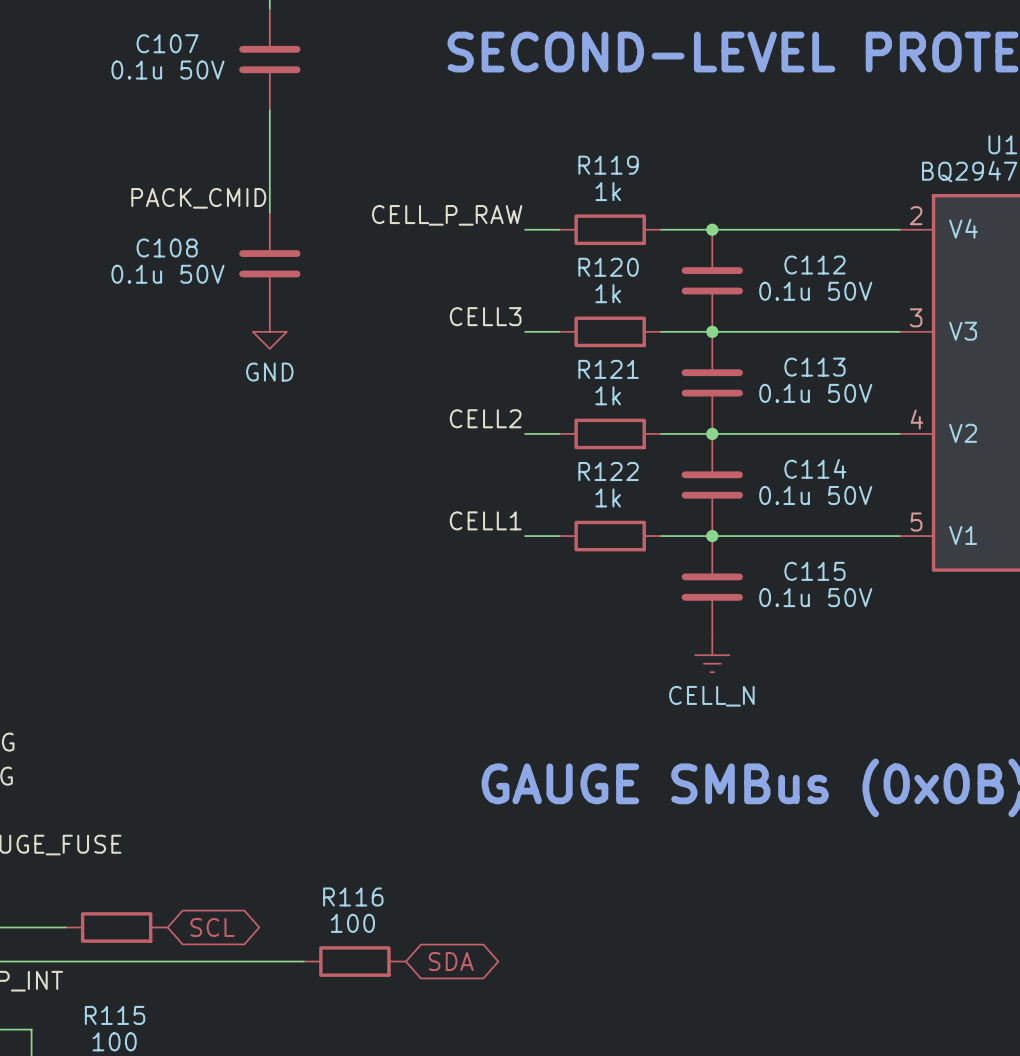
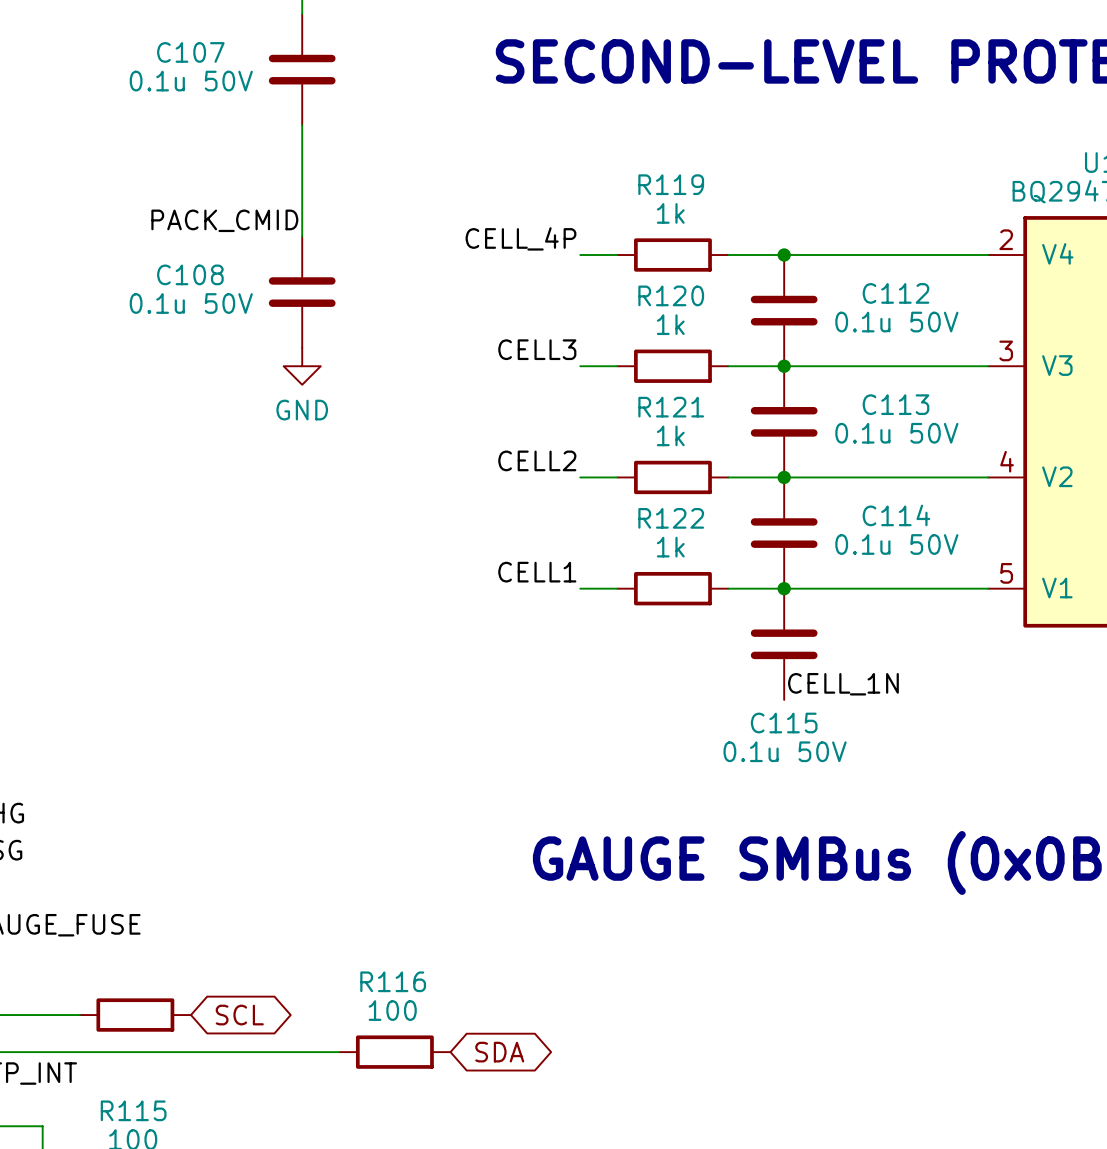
label: CELL_P_RAW (447, 215) -> CELL_4P (520, 238)
C115 name position: C115 (814, 571) -> C115 (784, 723)
C115 value position: 0.1u 50V (815, 597) -> 0.1u 50V (785, 751)
label: none -> CELL_1N (843, 684)
power symbol: CELL_N (712, 655) -> none

